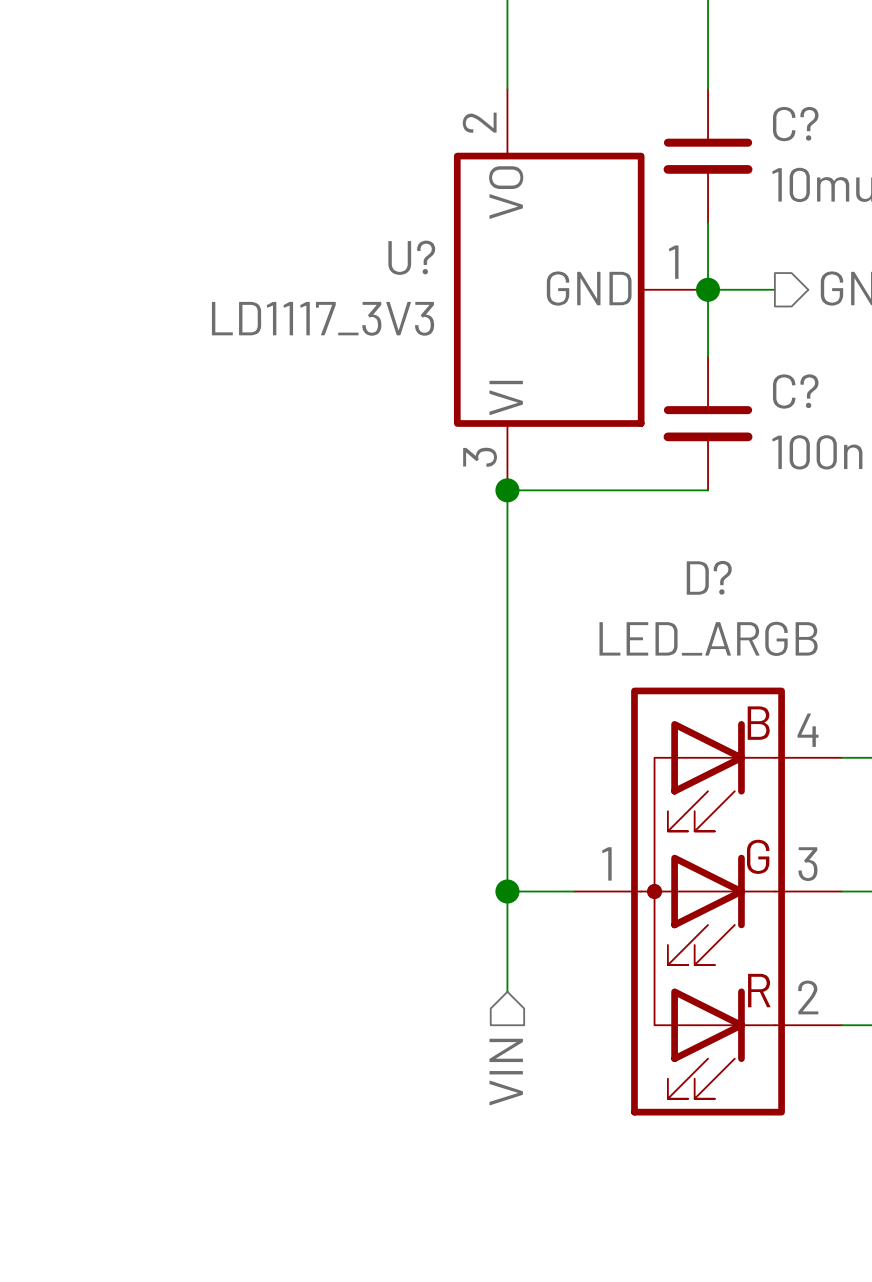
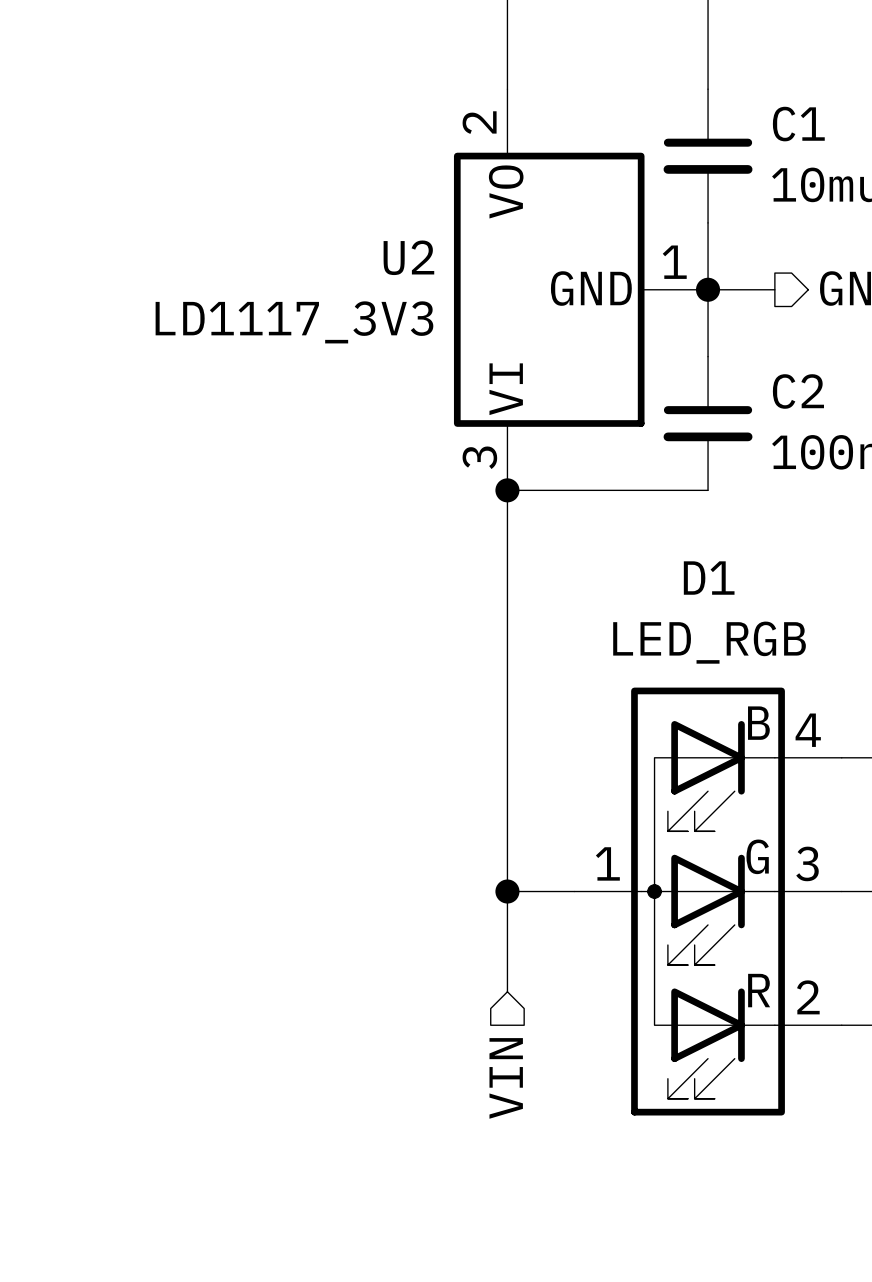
C? name: C? (795, 124) -> C1 (798, 124)
U? name: U? (411, 257) -> U2 (408, 257)
C? name: C? (795, 391) -> C2 (798, 391)
D? name: D? (709, 577) -> D1 (709, 578)
D? value: LED_ARGB (708, 638) -> LED_RGB (709, 642)

